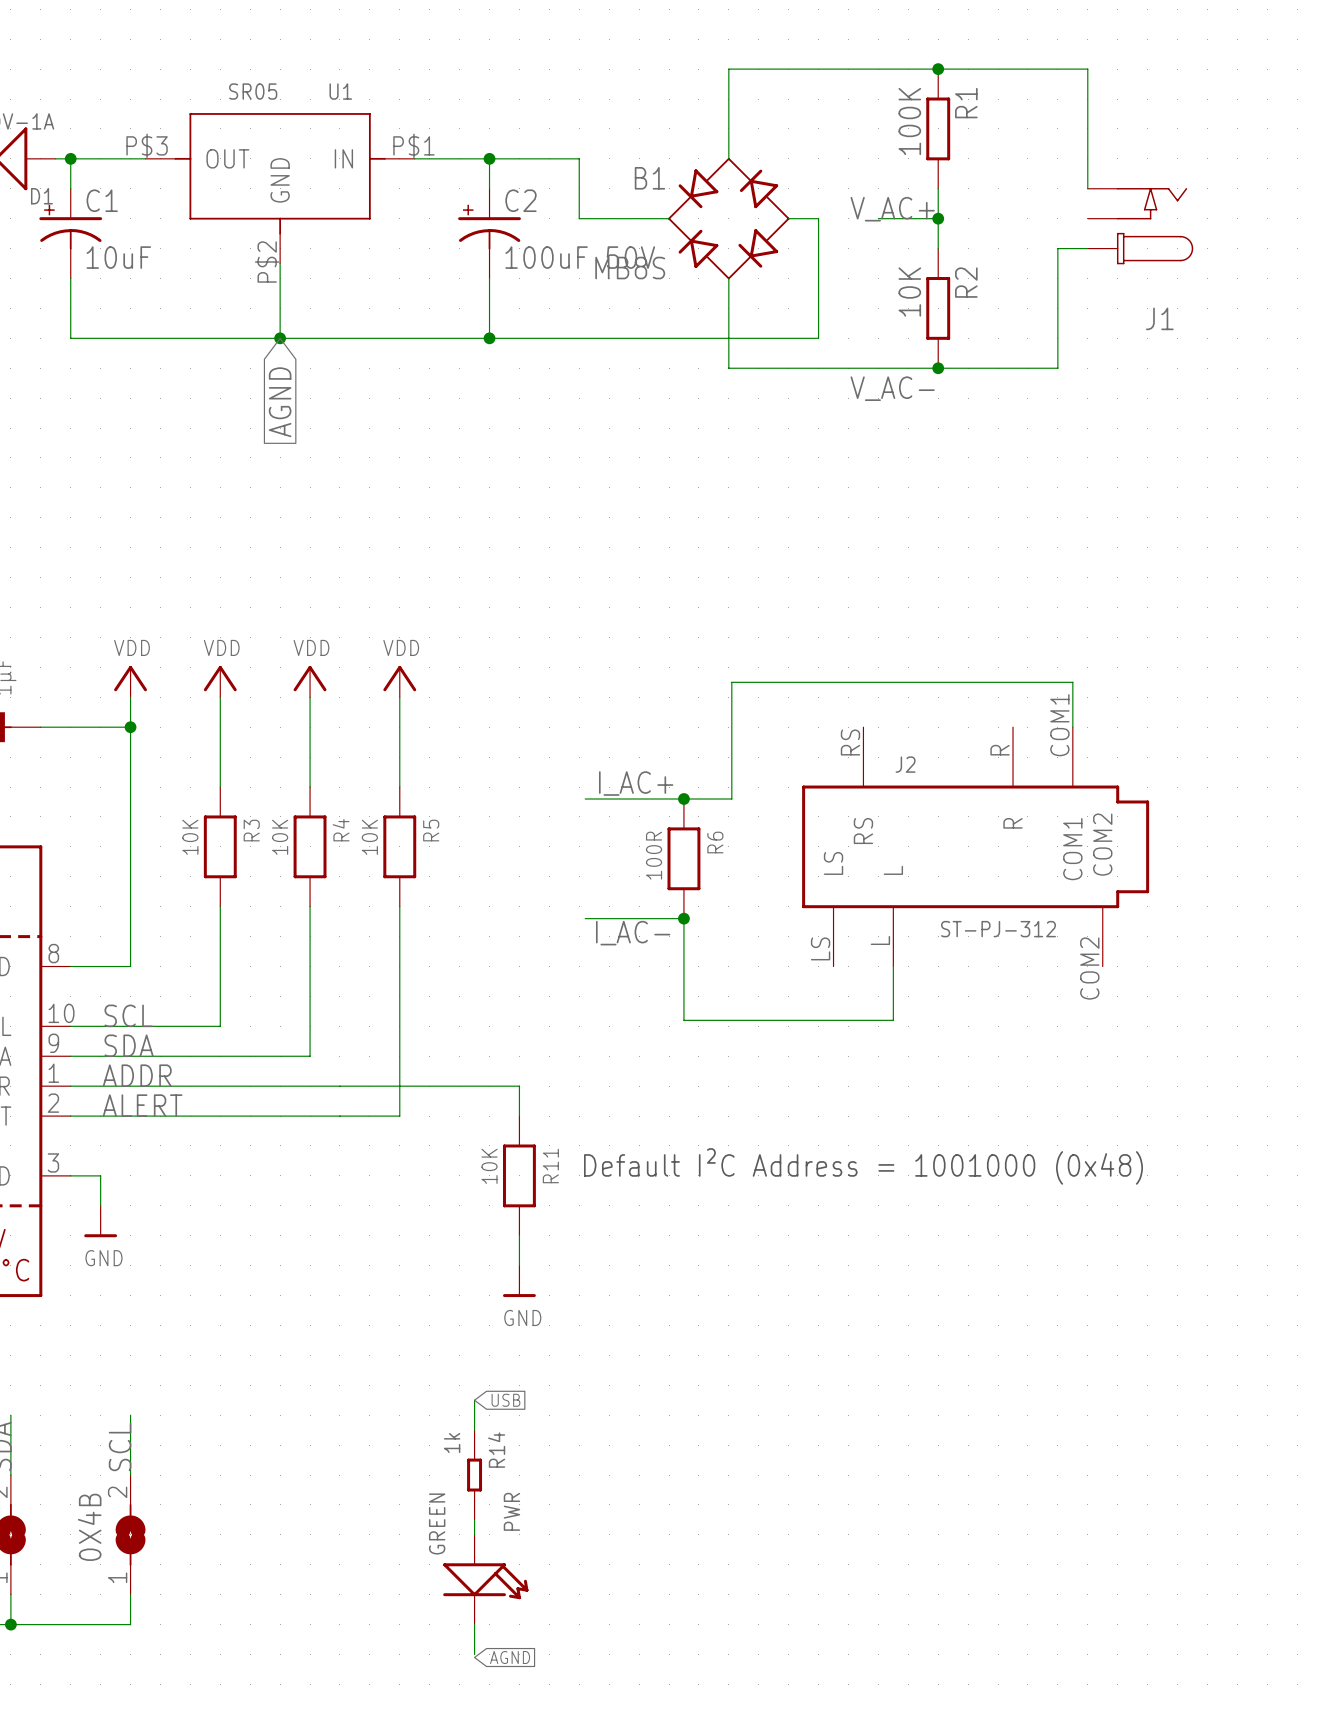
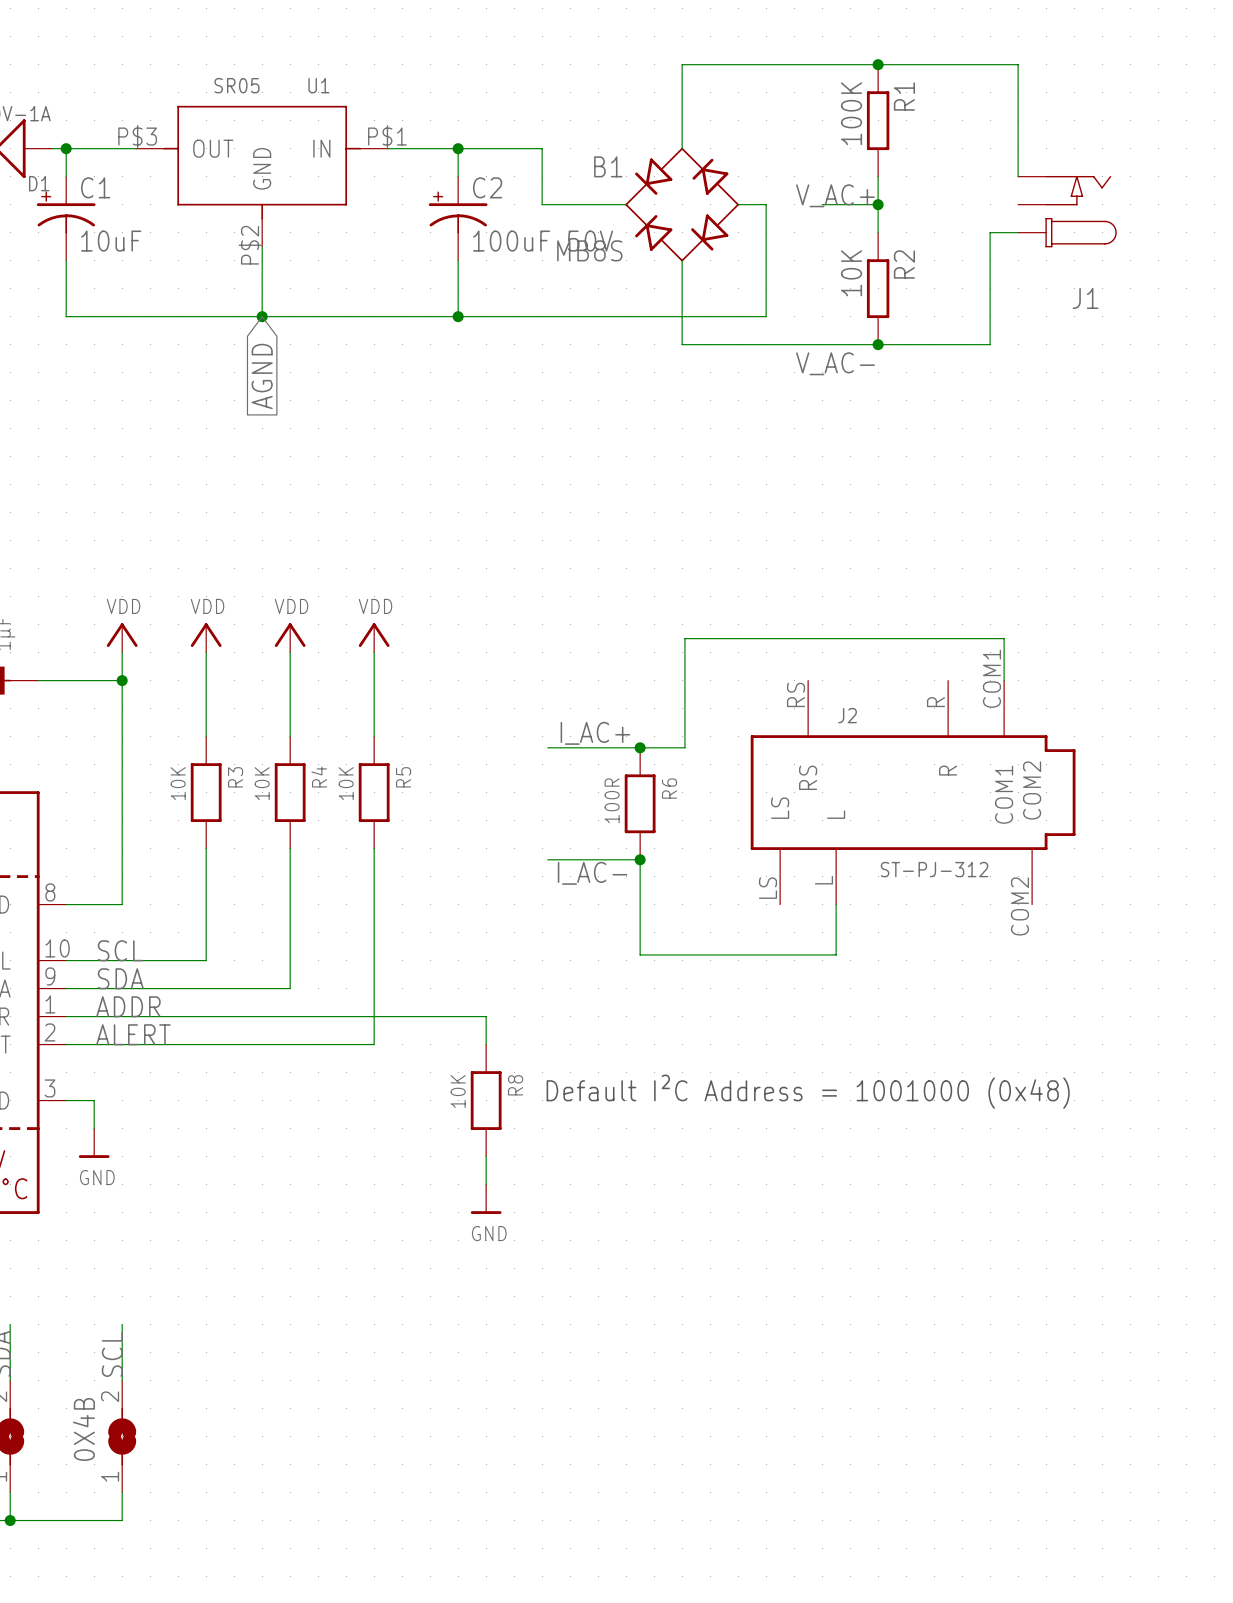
R11 name: R11 (550, 1166) -> R8 (515, 1085)
wire: (474, 1400) (474, 1430) -> none
global label: USB (505, 1400) -> none
R14: 1k (474, 1475) -> none
wire: (474, 1519) (474, 1534) -> none
PWR: GREEN (485, 1579) -> none
wire: (474, 1624) (474, 1654) -> none
global label: AGND (510, 1657) -> none

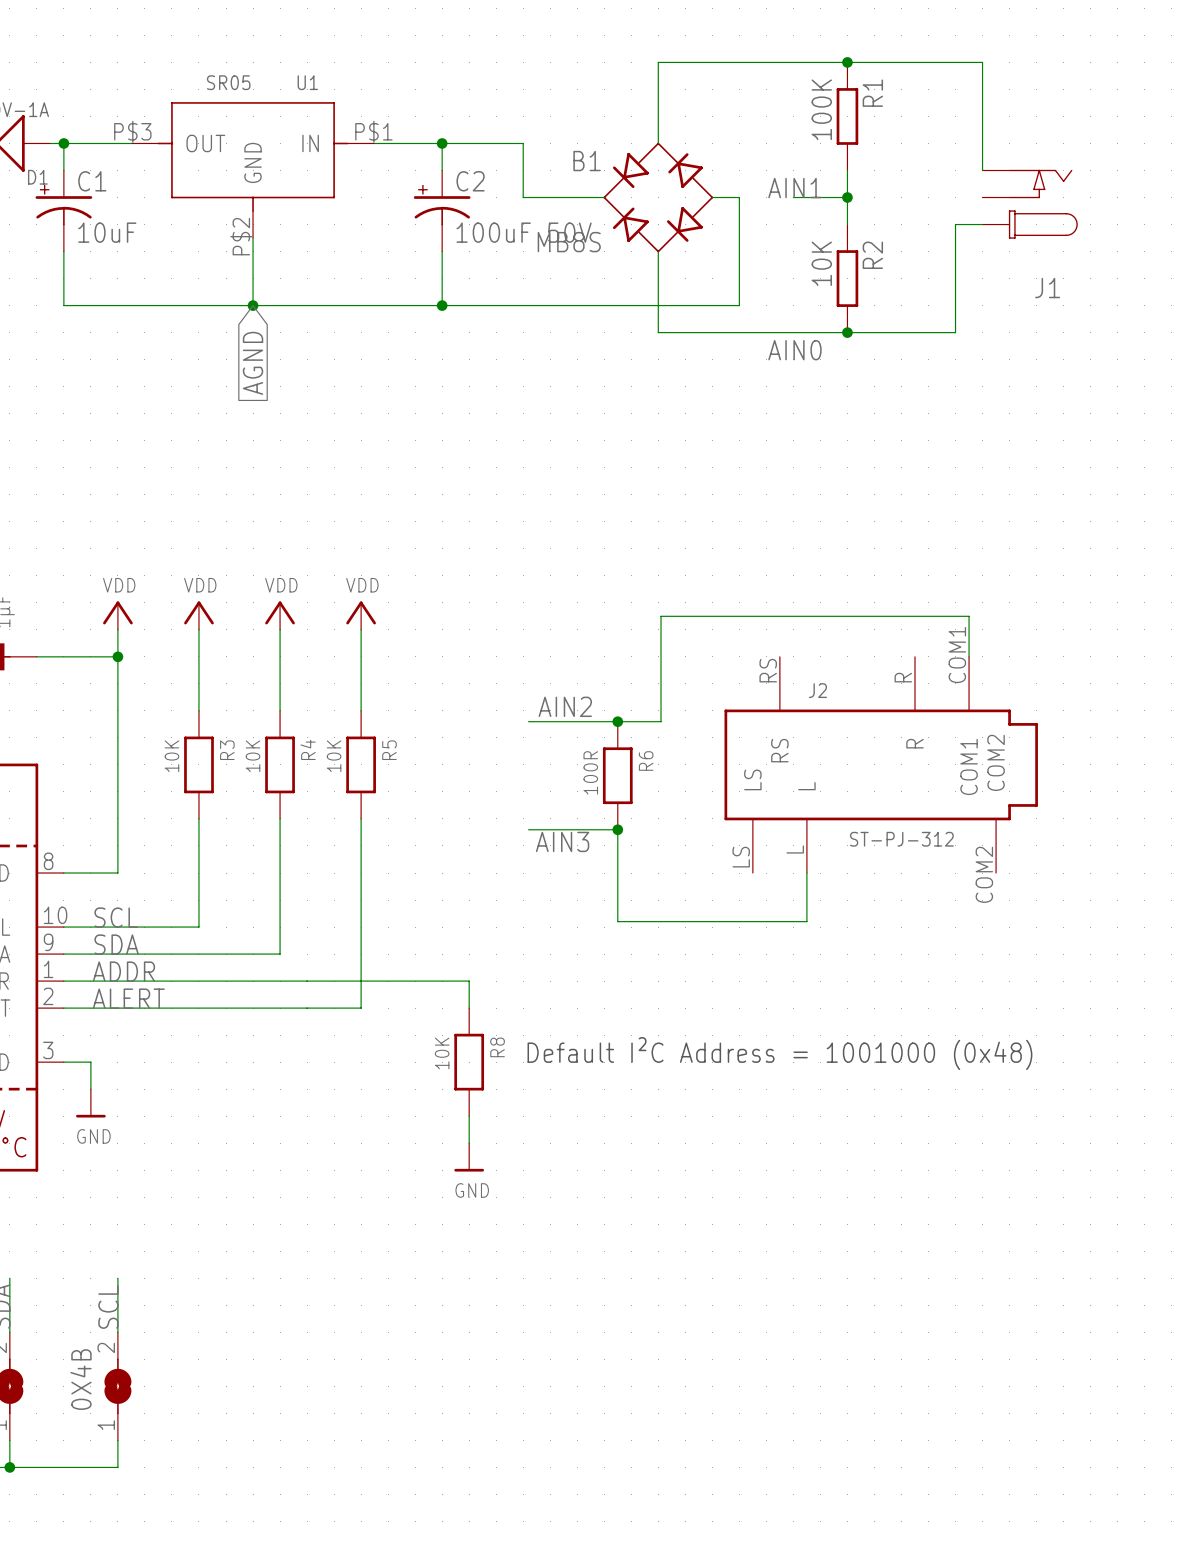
label: V_AC+ (835, 195) -> AIN1 (794, 188)
label: V_AC- (835, 363) -> AIN0 (794, 350)
label: I_AC+ (595, 733) -> AIN2 (565, 706)
label: I_AC- (592, 873) -> AIN3 (562, 841)

